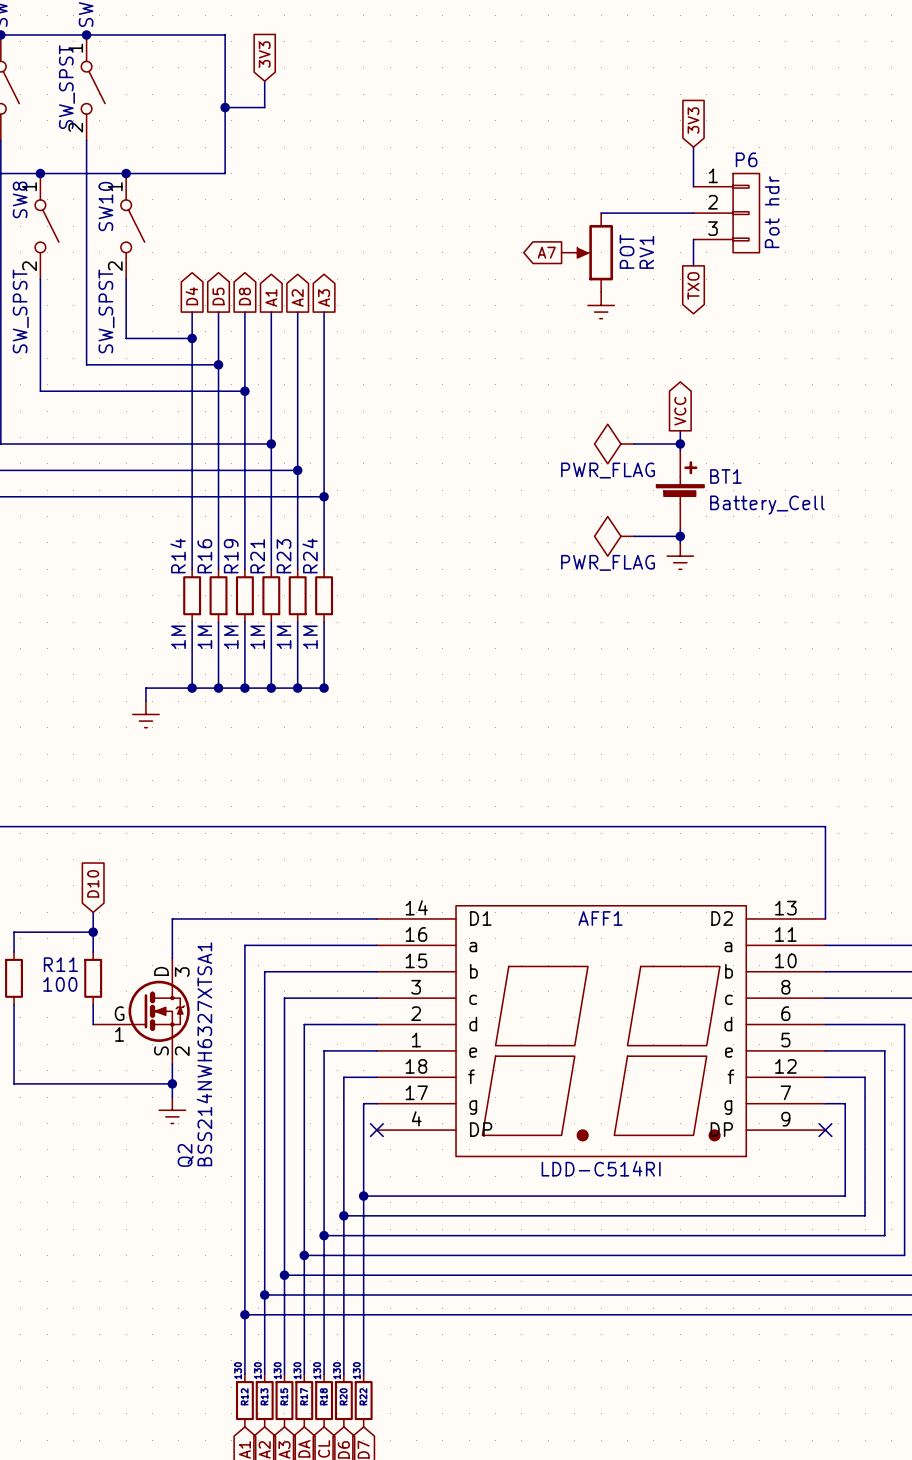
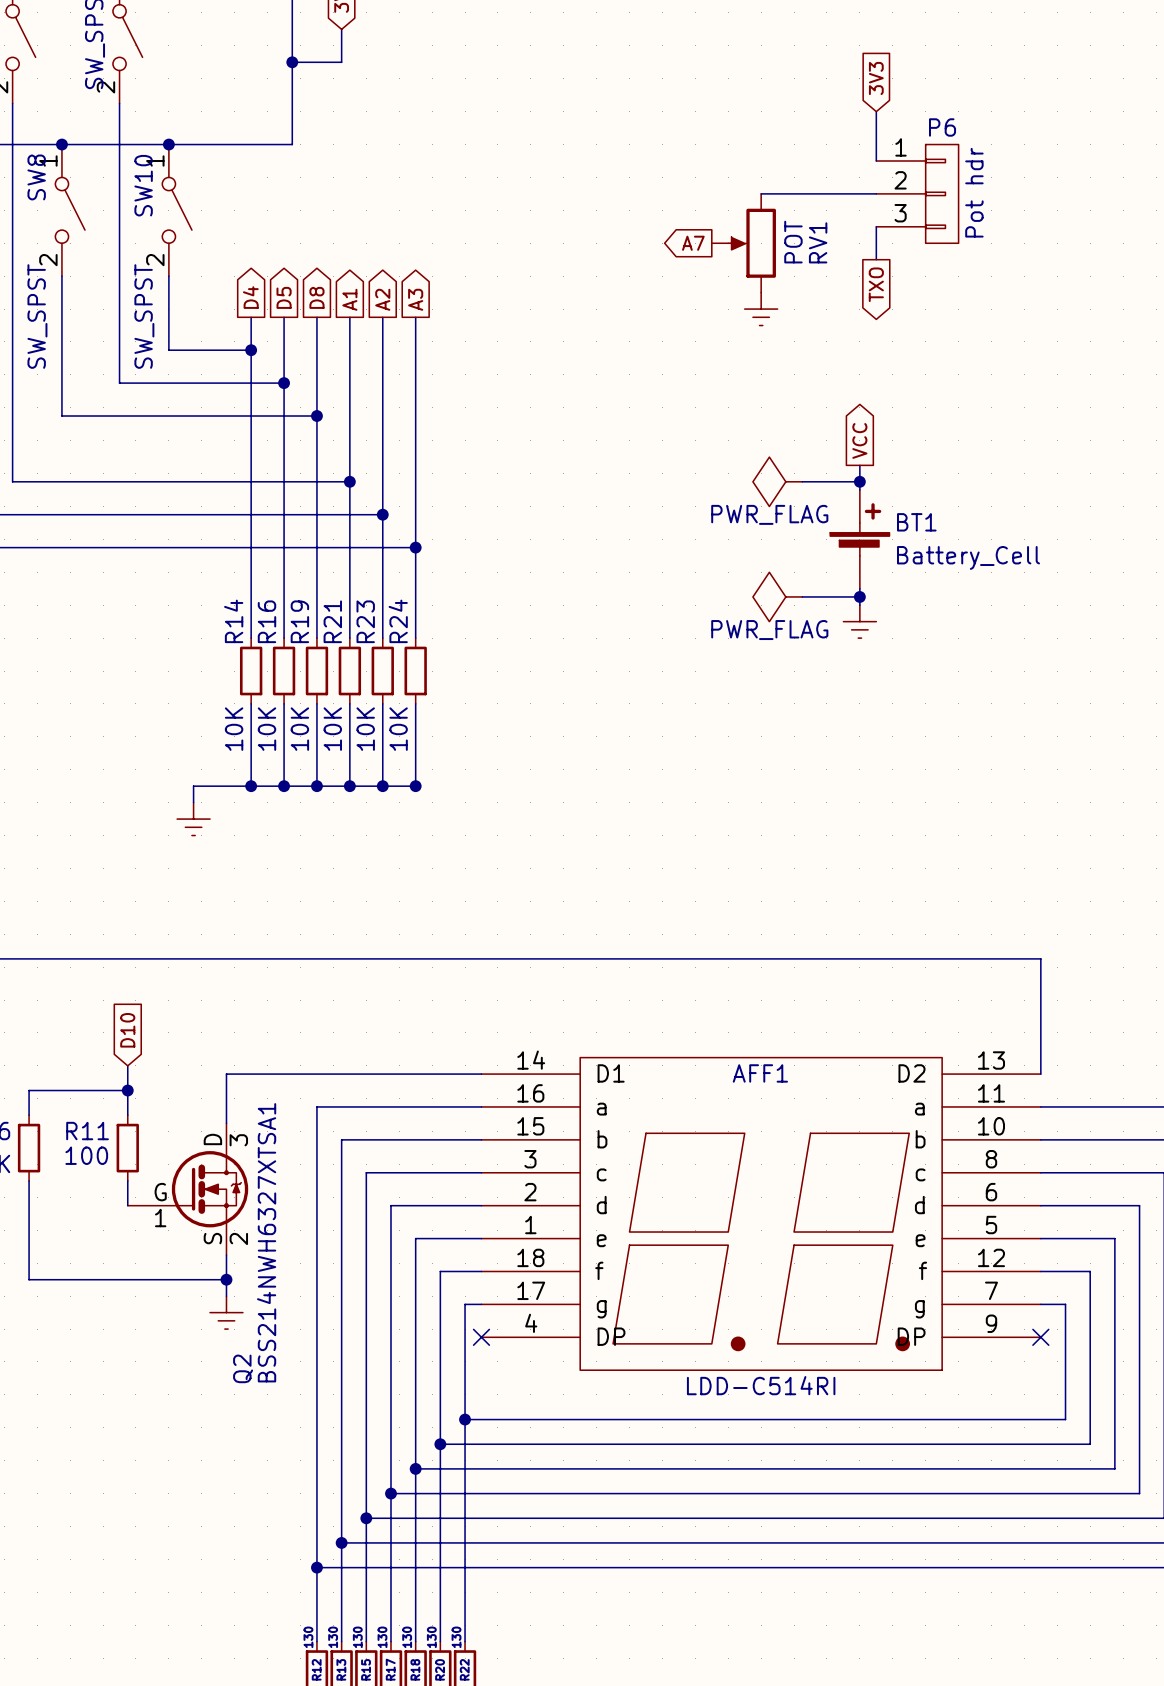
R14 value: 1M (178, 637) -> 10K (234, 729)
R16 value: 1M (204, 637) -> 10K (266, 729)
R19 value: 1M (231, 637) -> 10K (299, 729)
R21 value: 1M (257, 637) -> 10K (332, 729)
R23 value: 1M (284, 637) -> 10K (365, 729)
R24 value: 1M (310, 637) -> 10K (398, 729)

